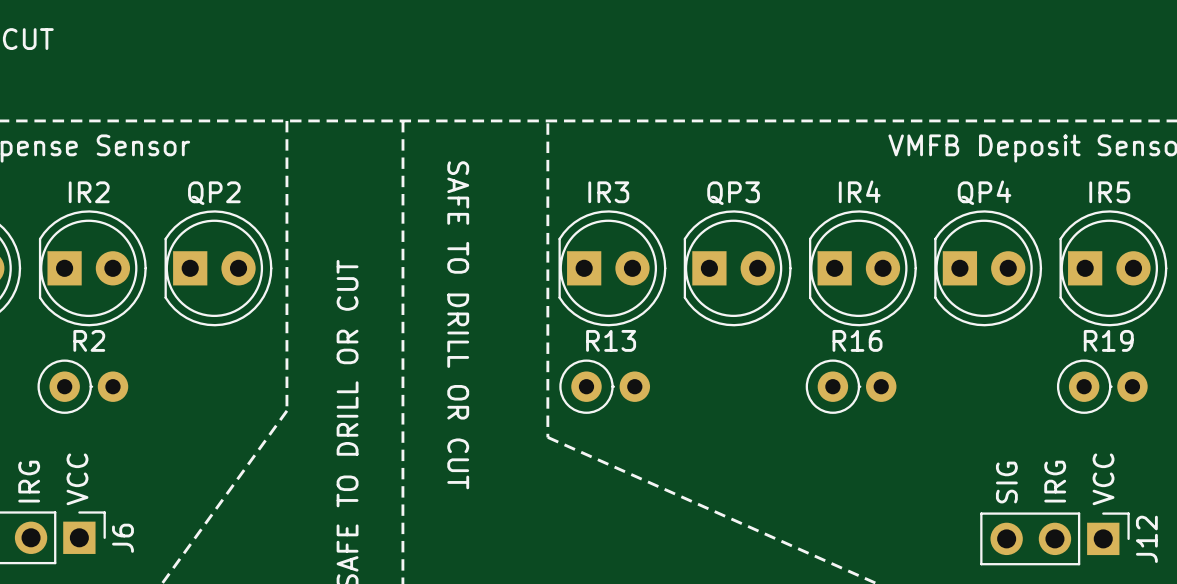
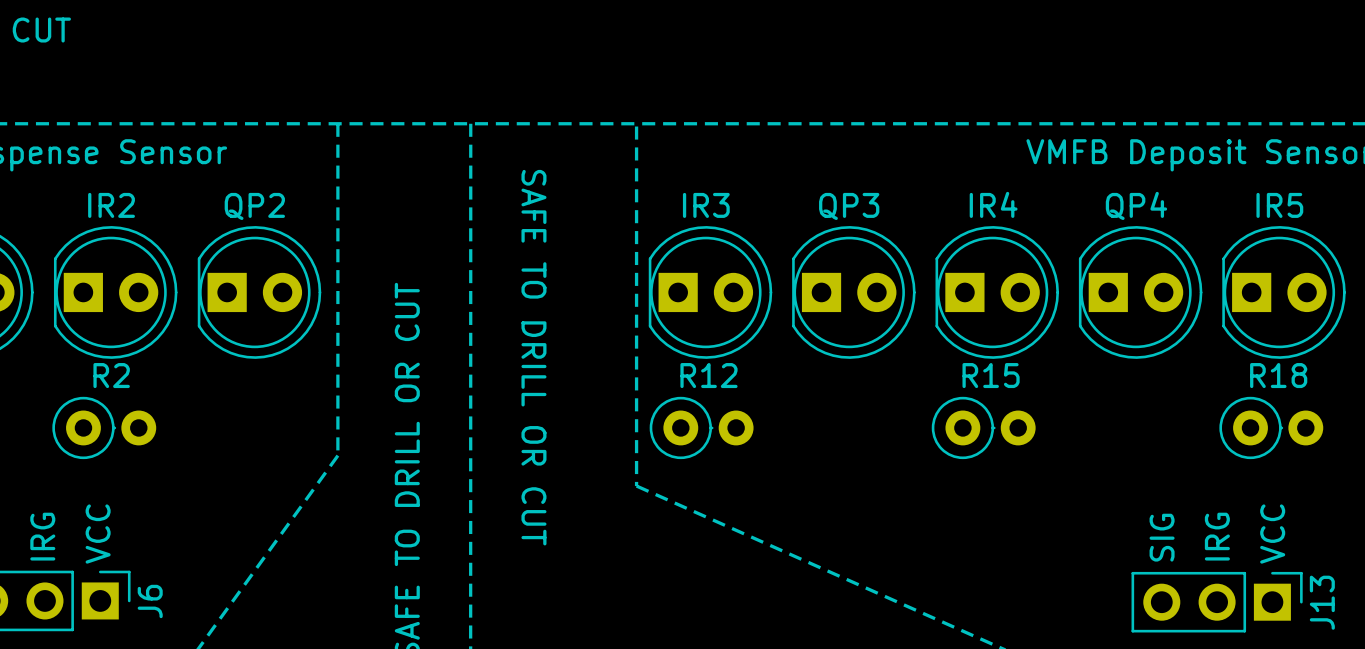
R13 name: R13 (611, 340) -> R12 (708, 375)
R16 name: R16 (857, 340) -> R15 (991, 375)
R19 name: R19 (1108, 340) -> R18 (1278, 375)
J12 name: J12 (1146, 539) -> J13 (1322, 602)

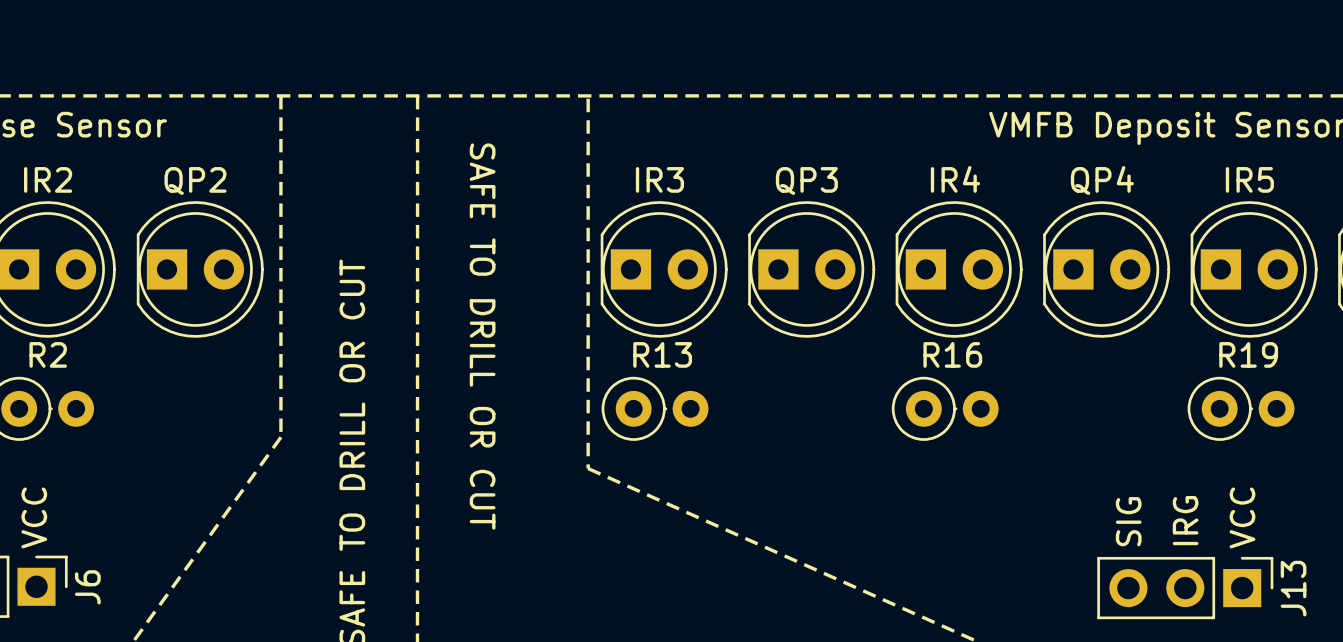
R12 name: R12 (708, 375) -> R13 (662, 354)
R15 name: R15 (991, 375) -> R16 (952, 354)
R18 name: R18 (1278, 375) -> R19 (1248, 354)

